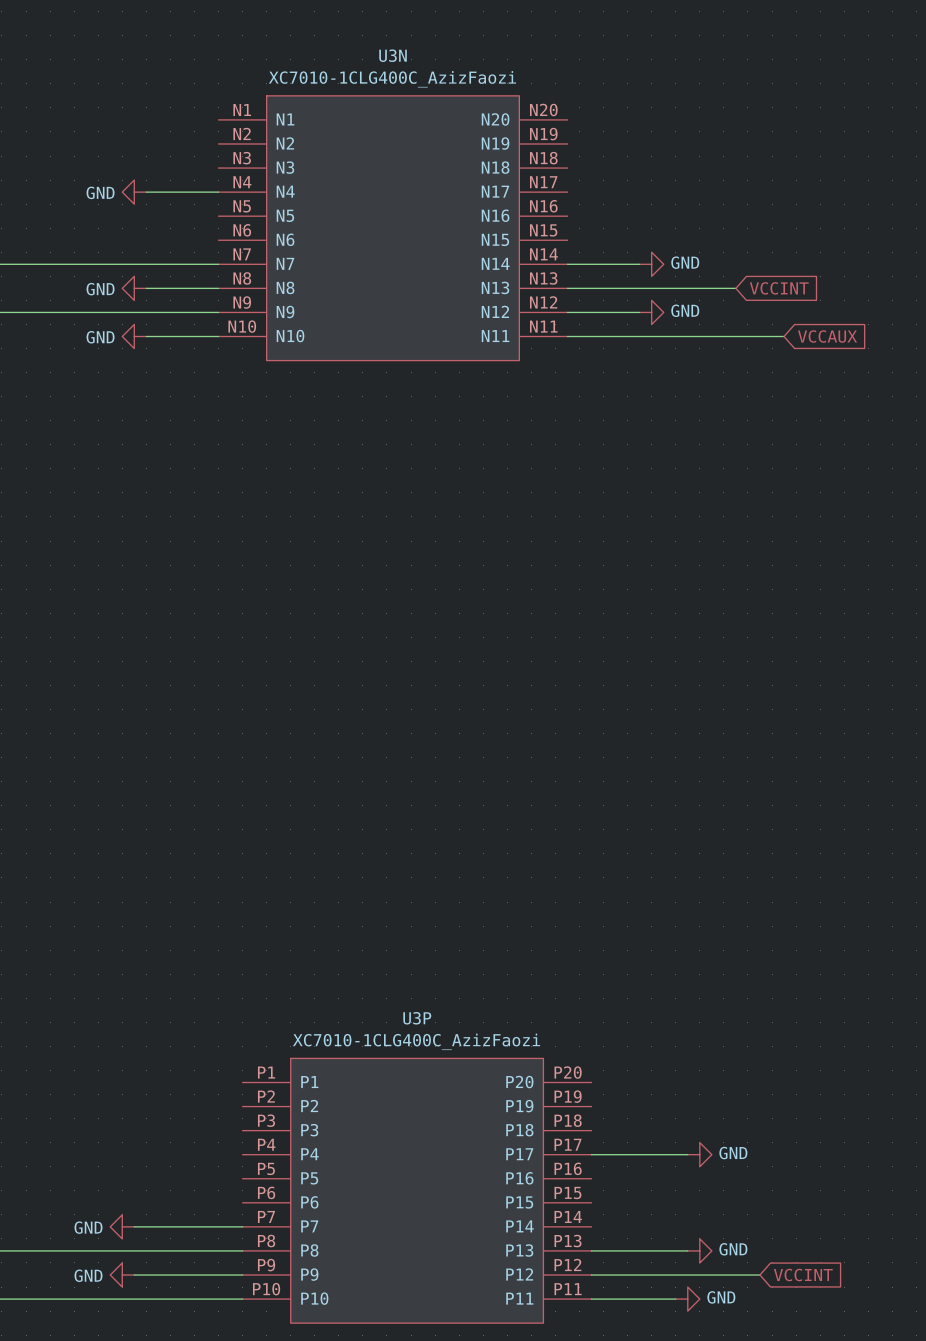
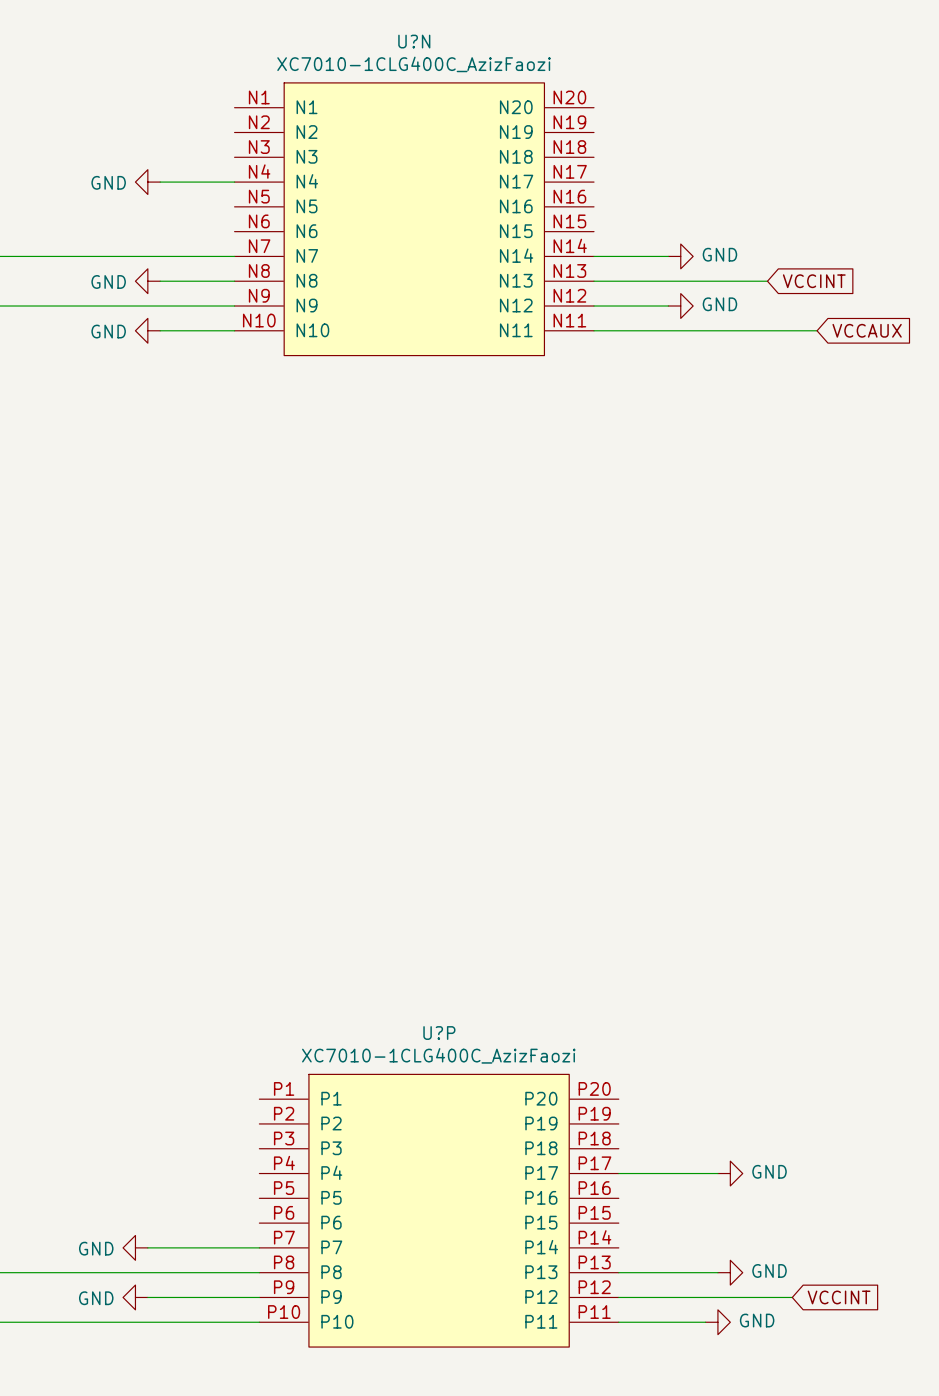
U3N name: U3N (393, 55) -> U?N (414, 41)
U3P name: U3P (417, 1018) -> U?P (439, 1033)

